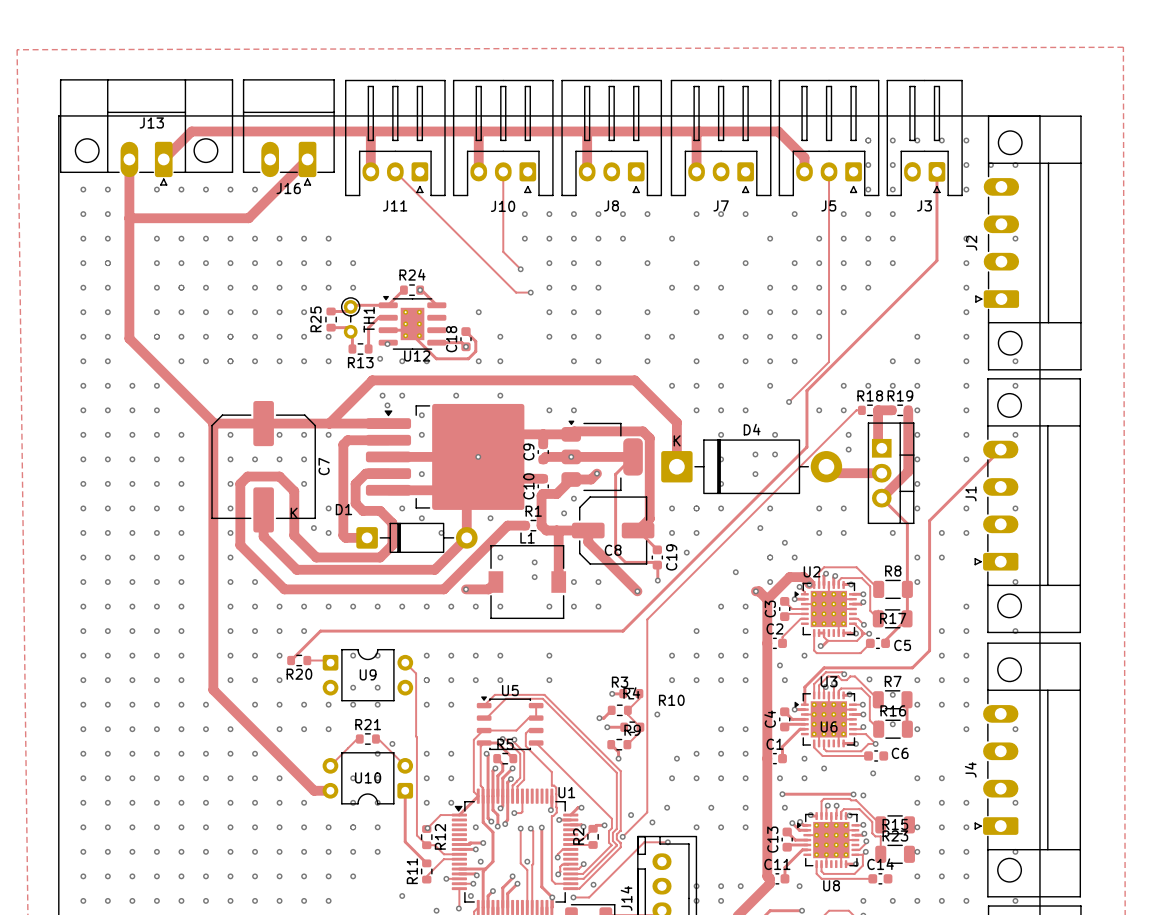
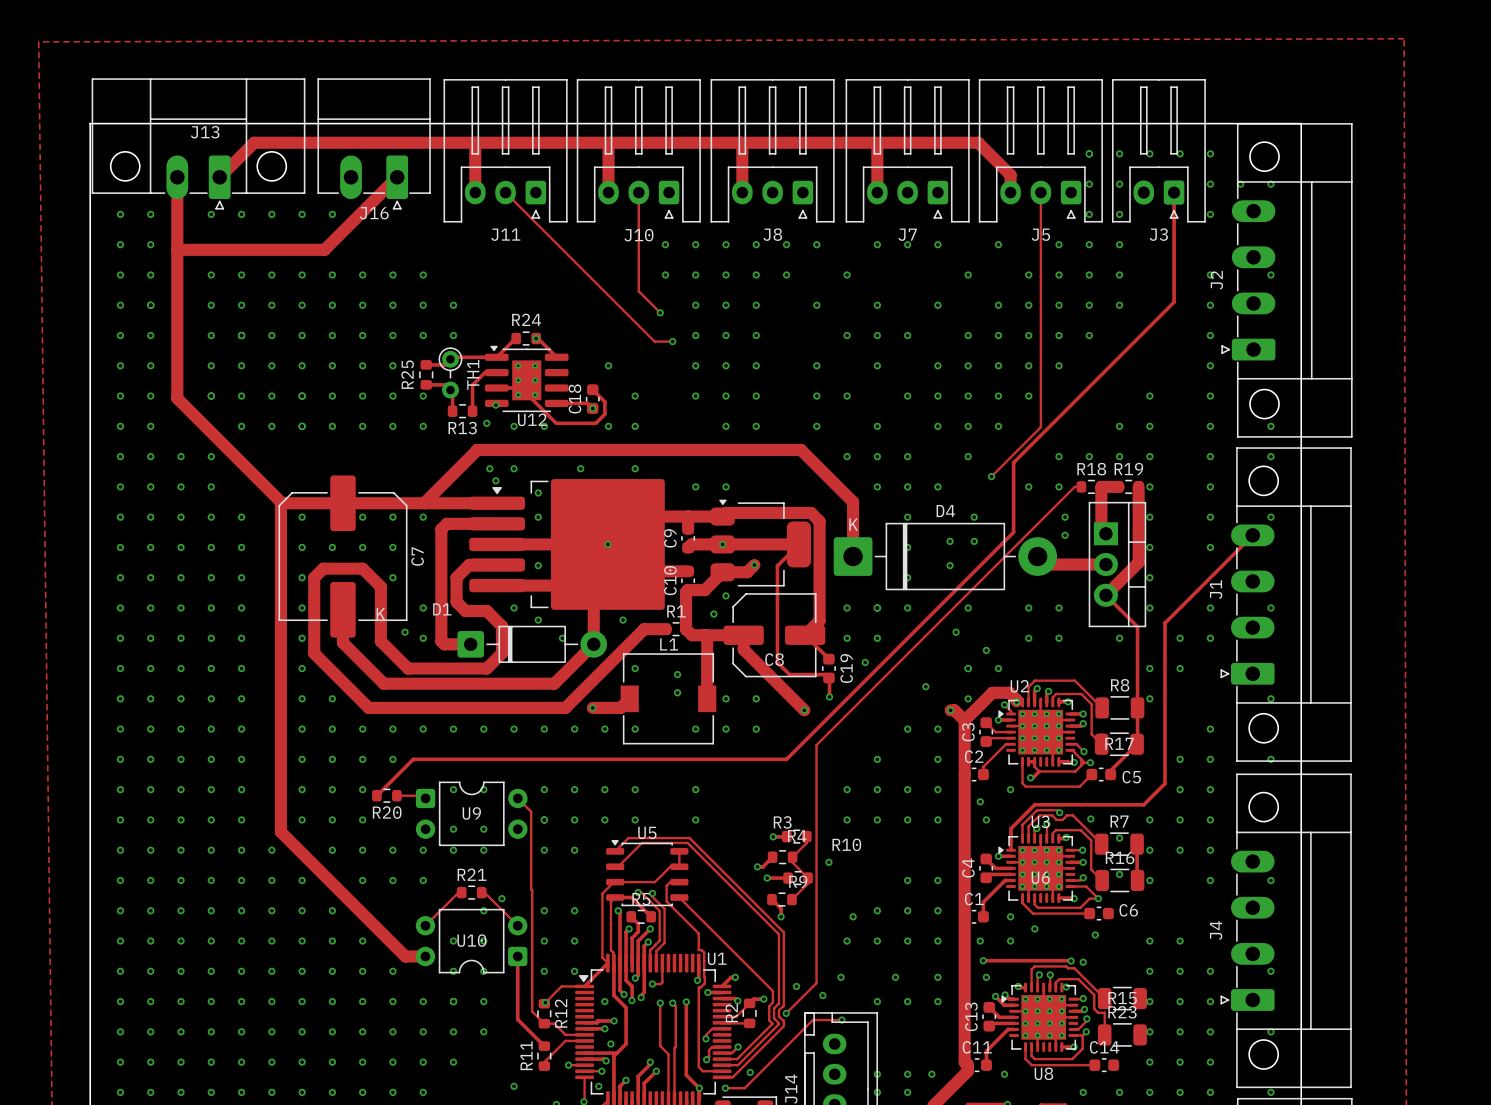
via: (527, 861) -> none

